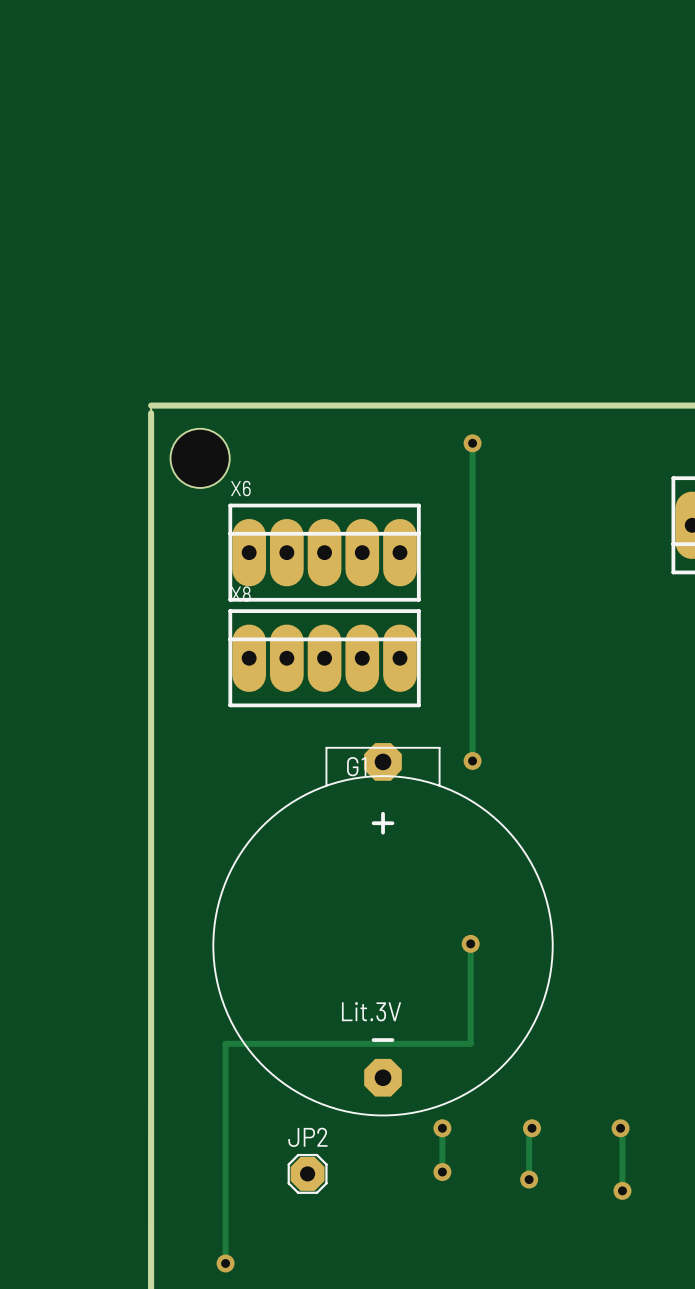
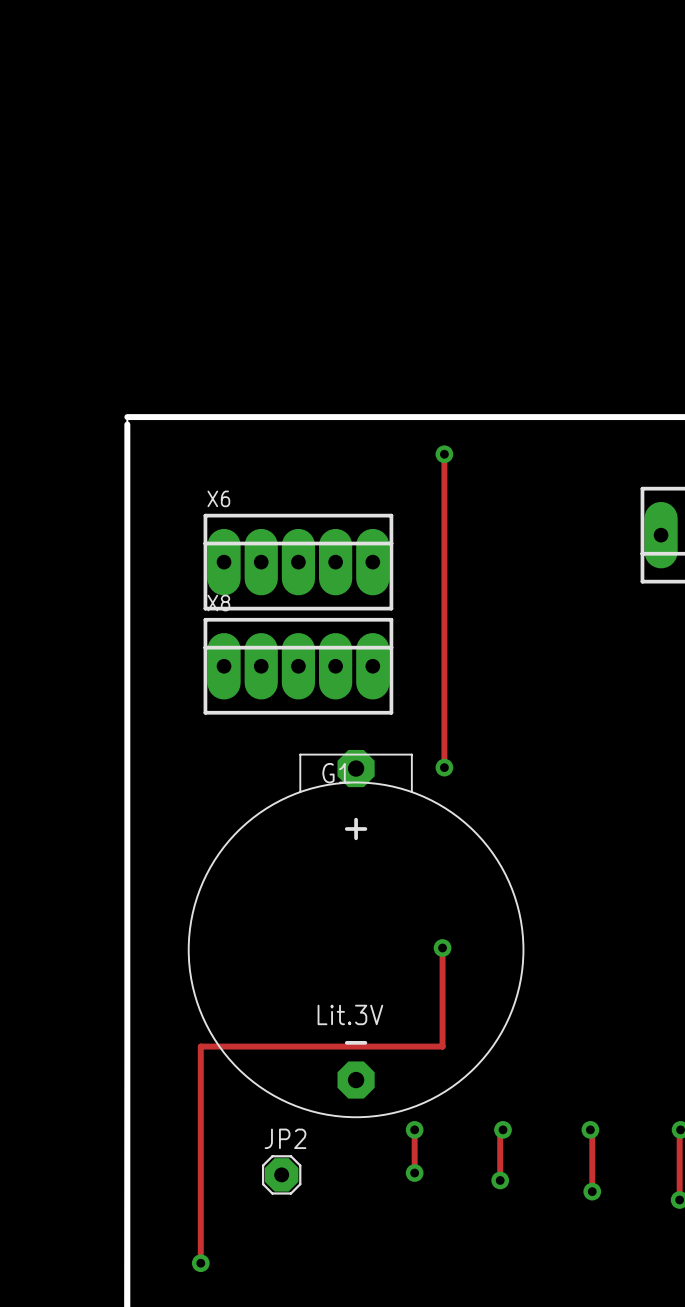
hole: (200, 458) -> none

